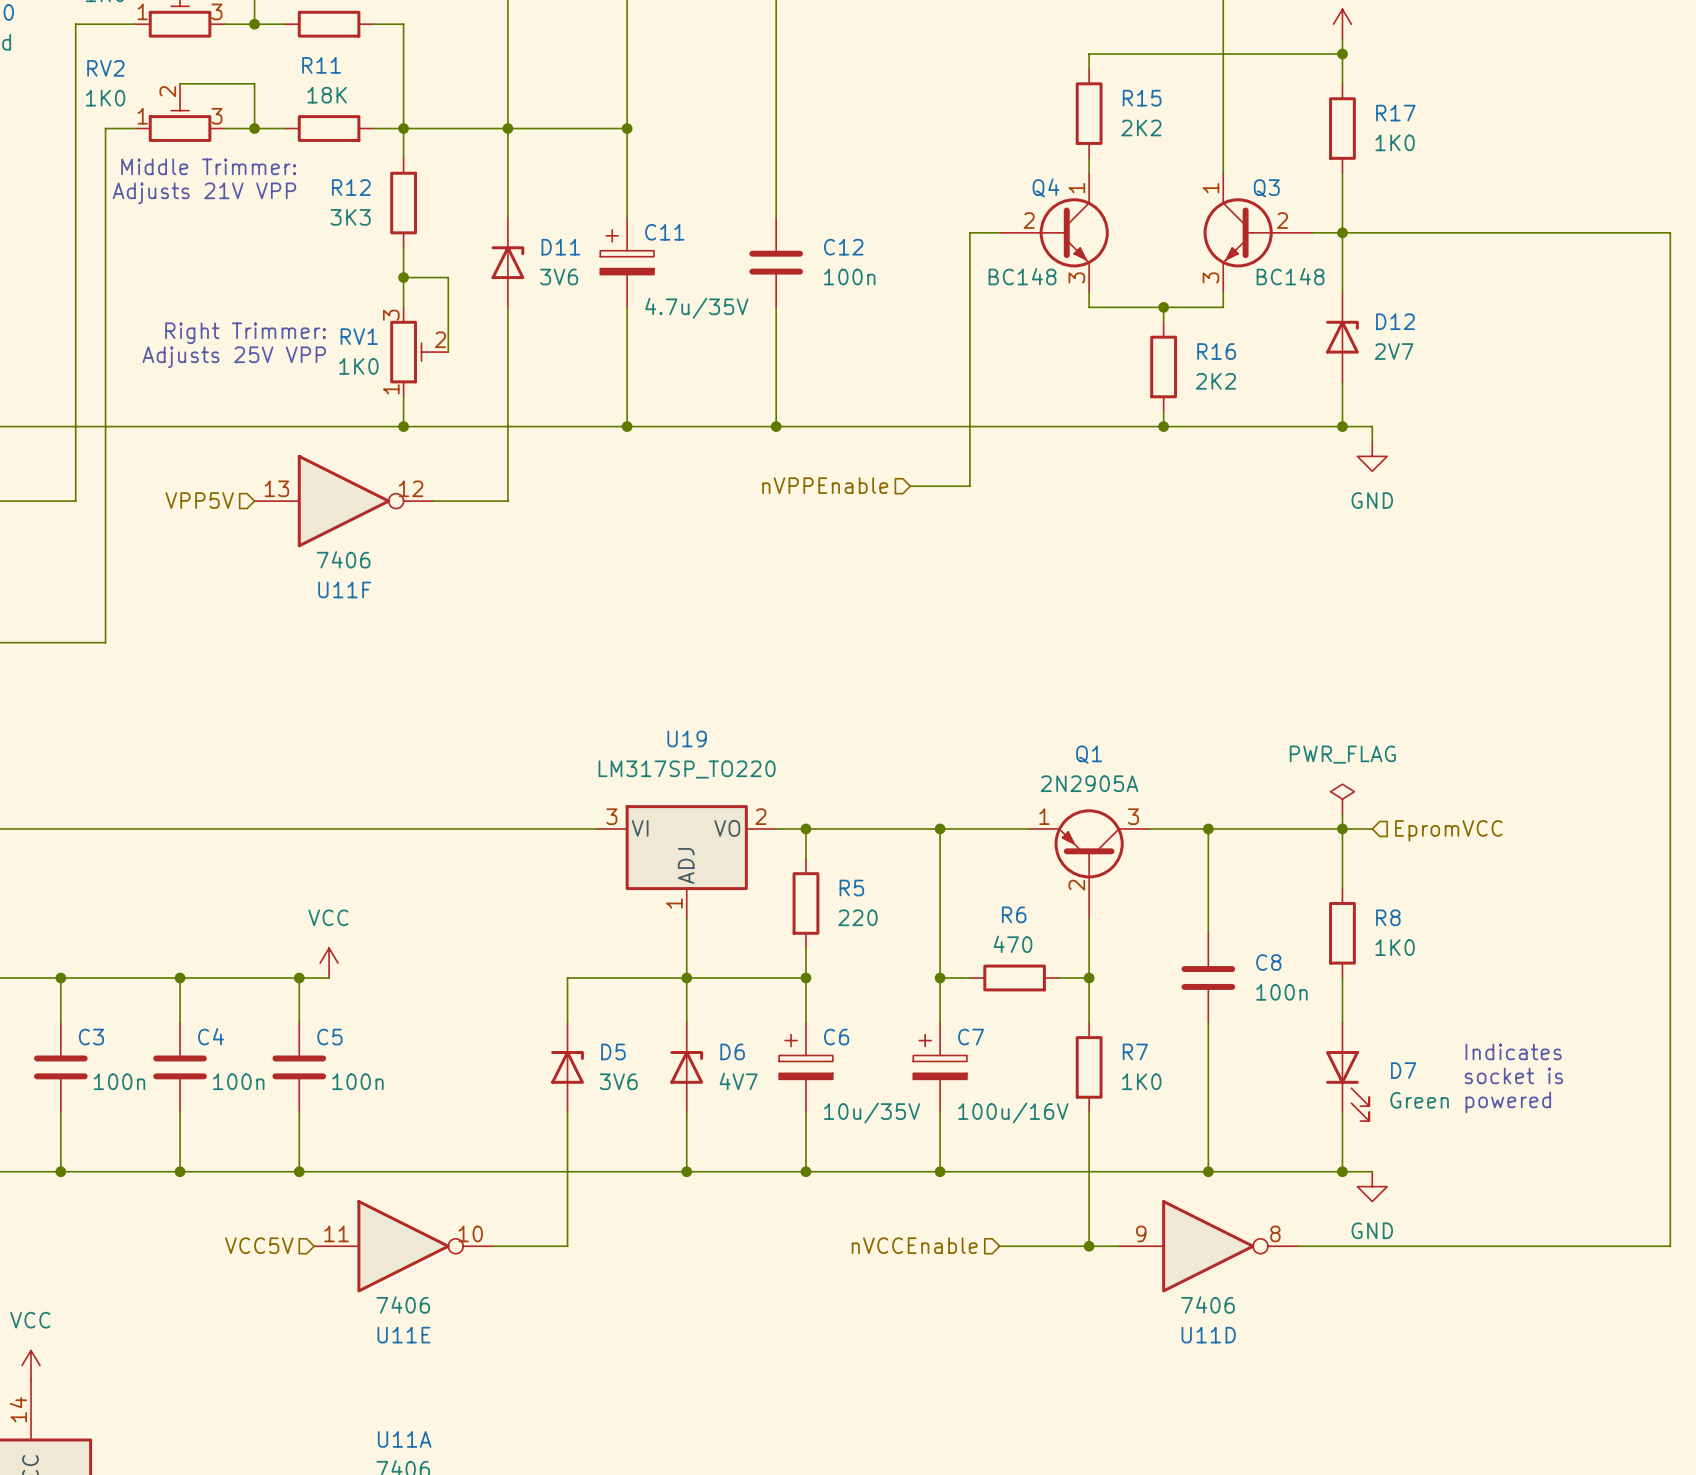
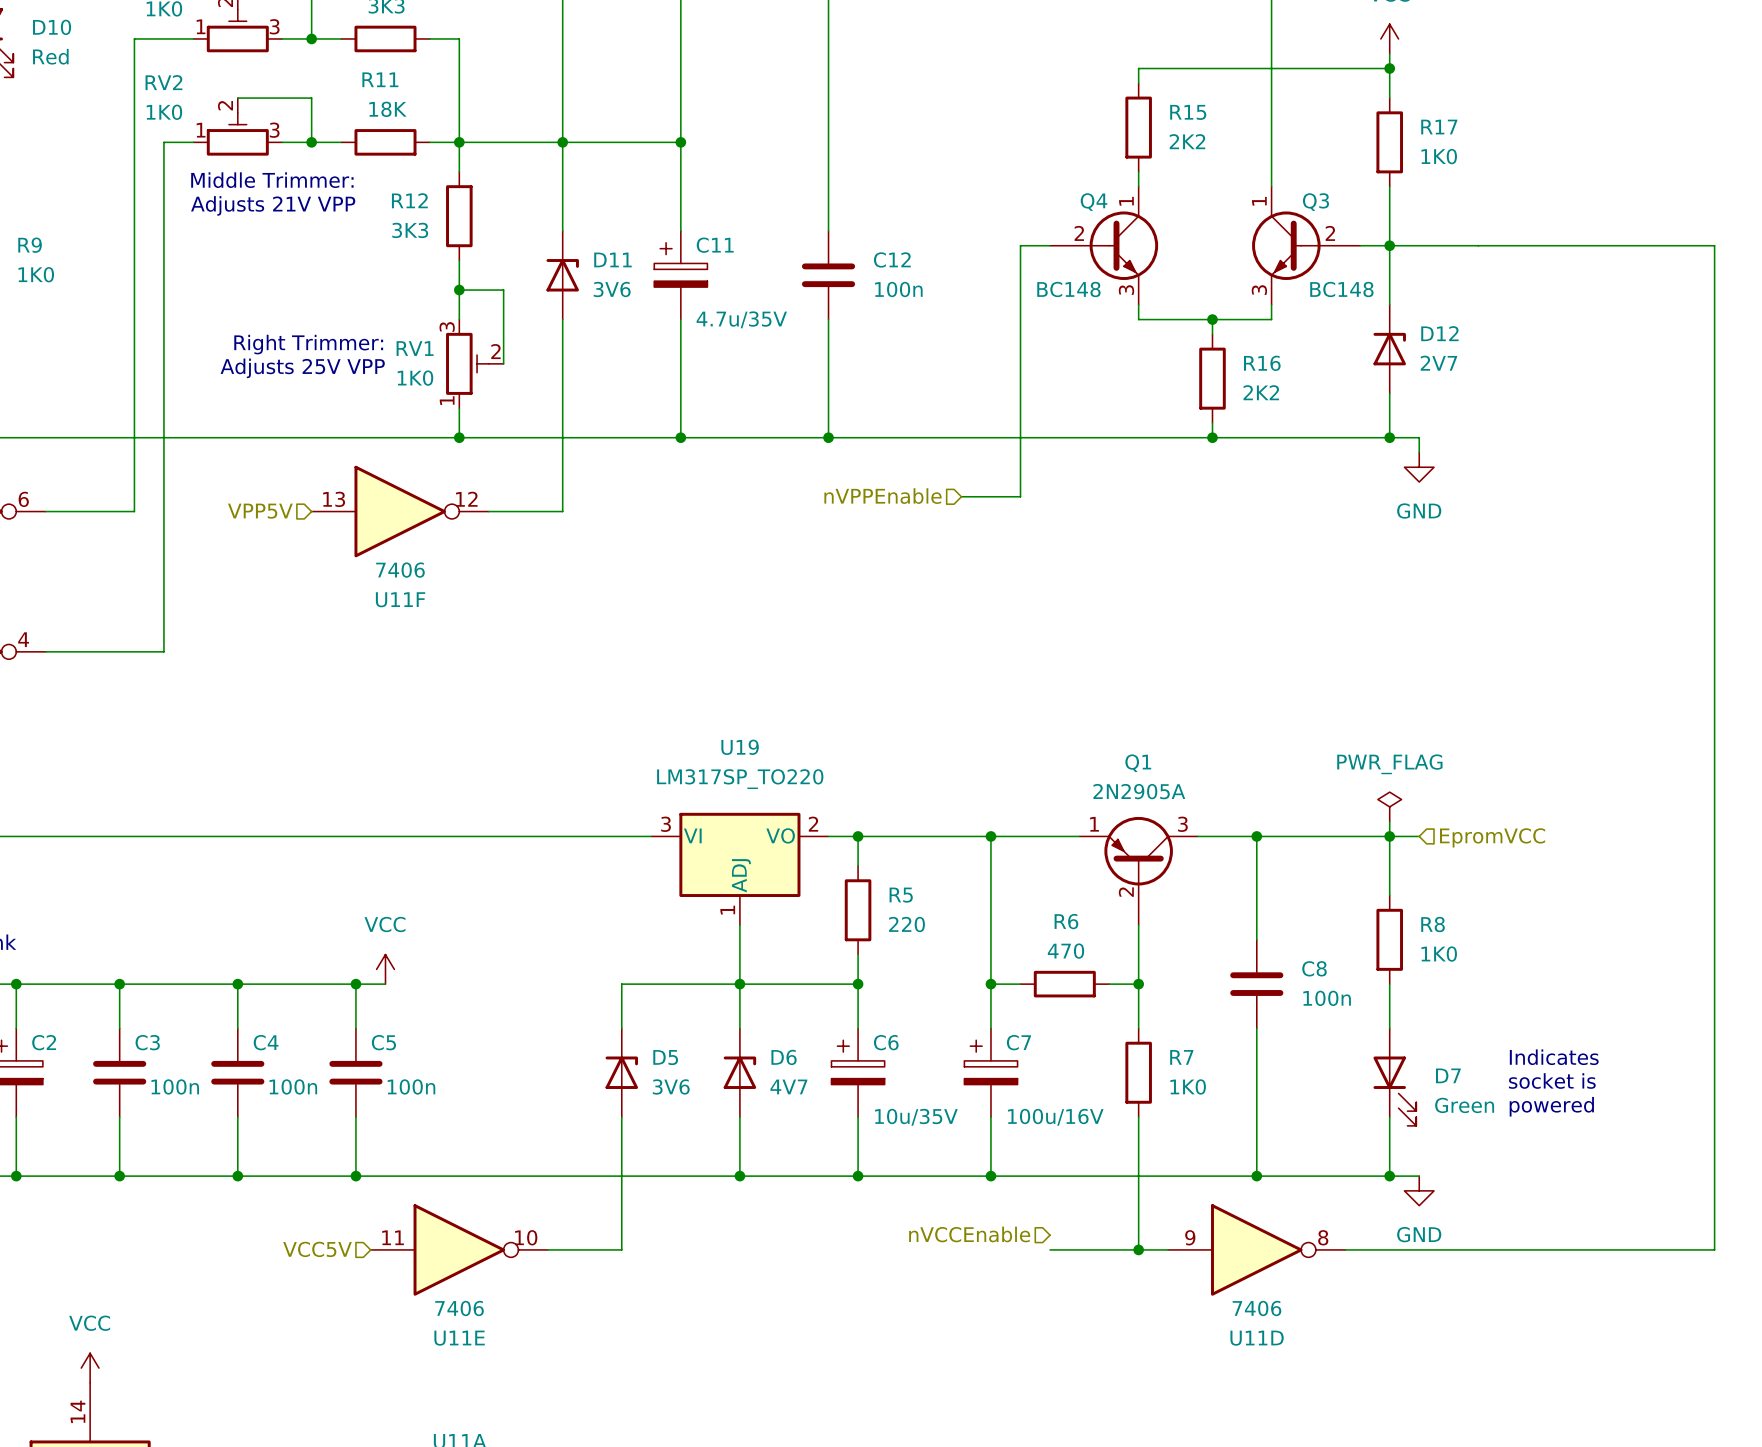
hierarchical label position: nVCCEnable (914, 1245) -> nVCCEnable (969, 1234)

